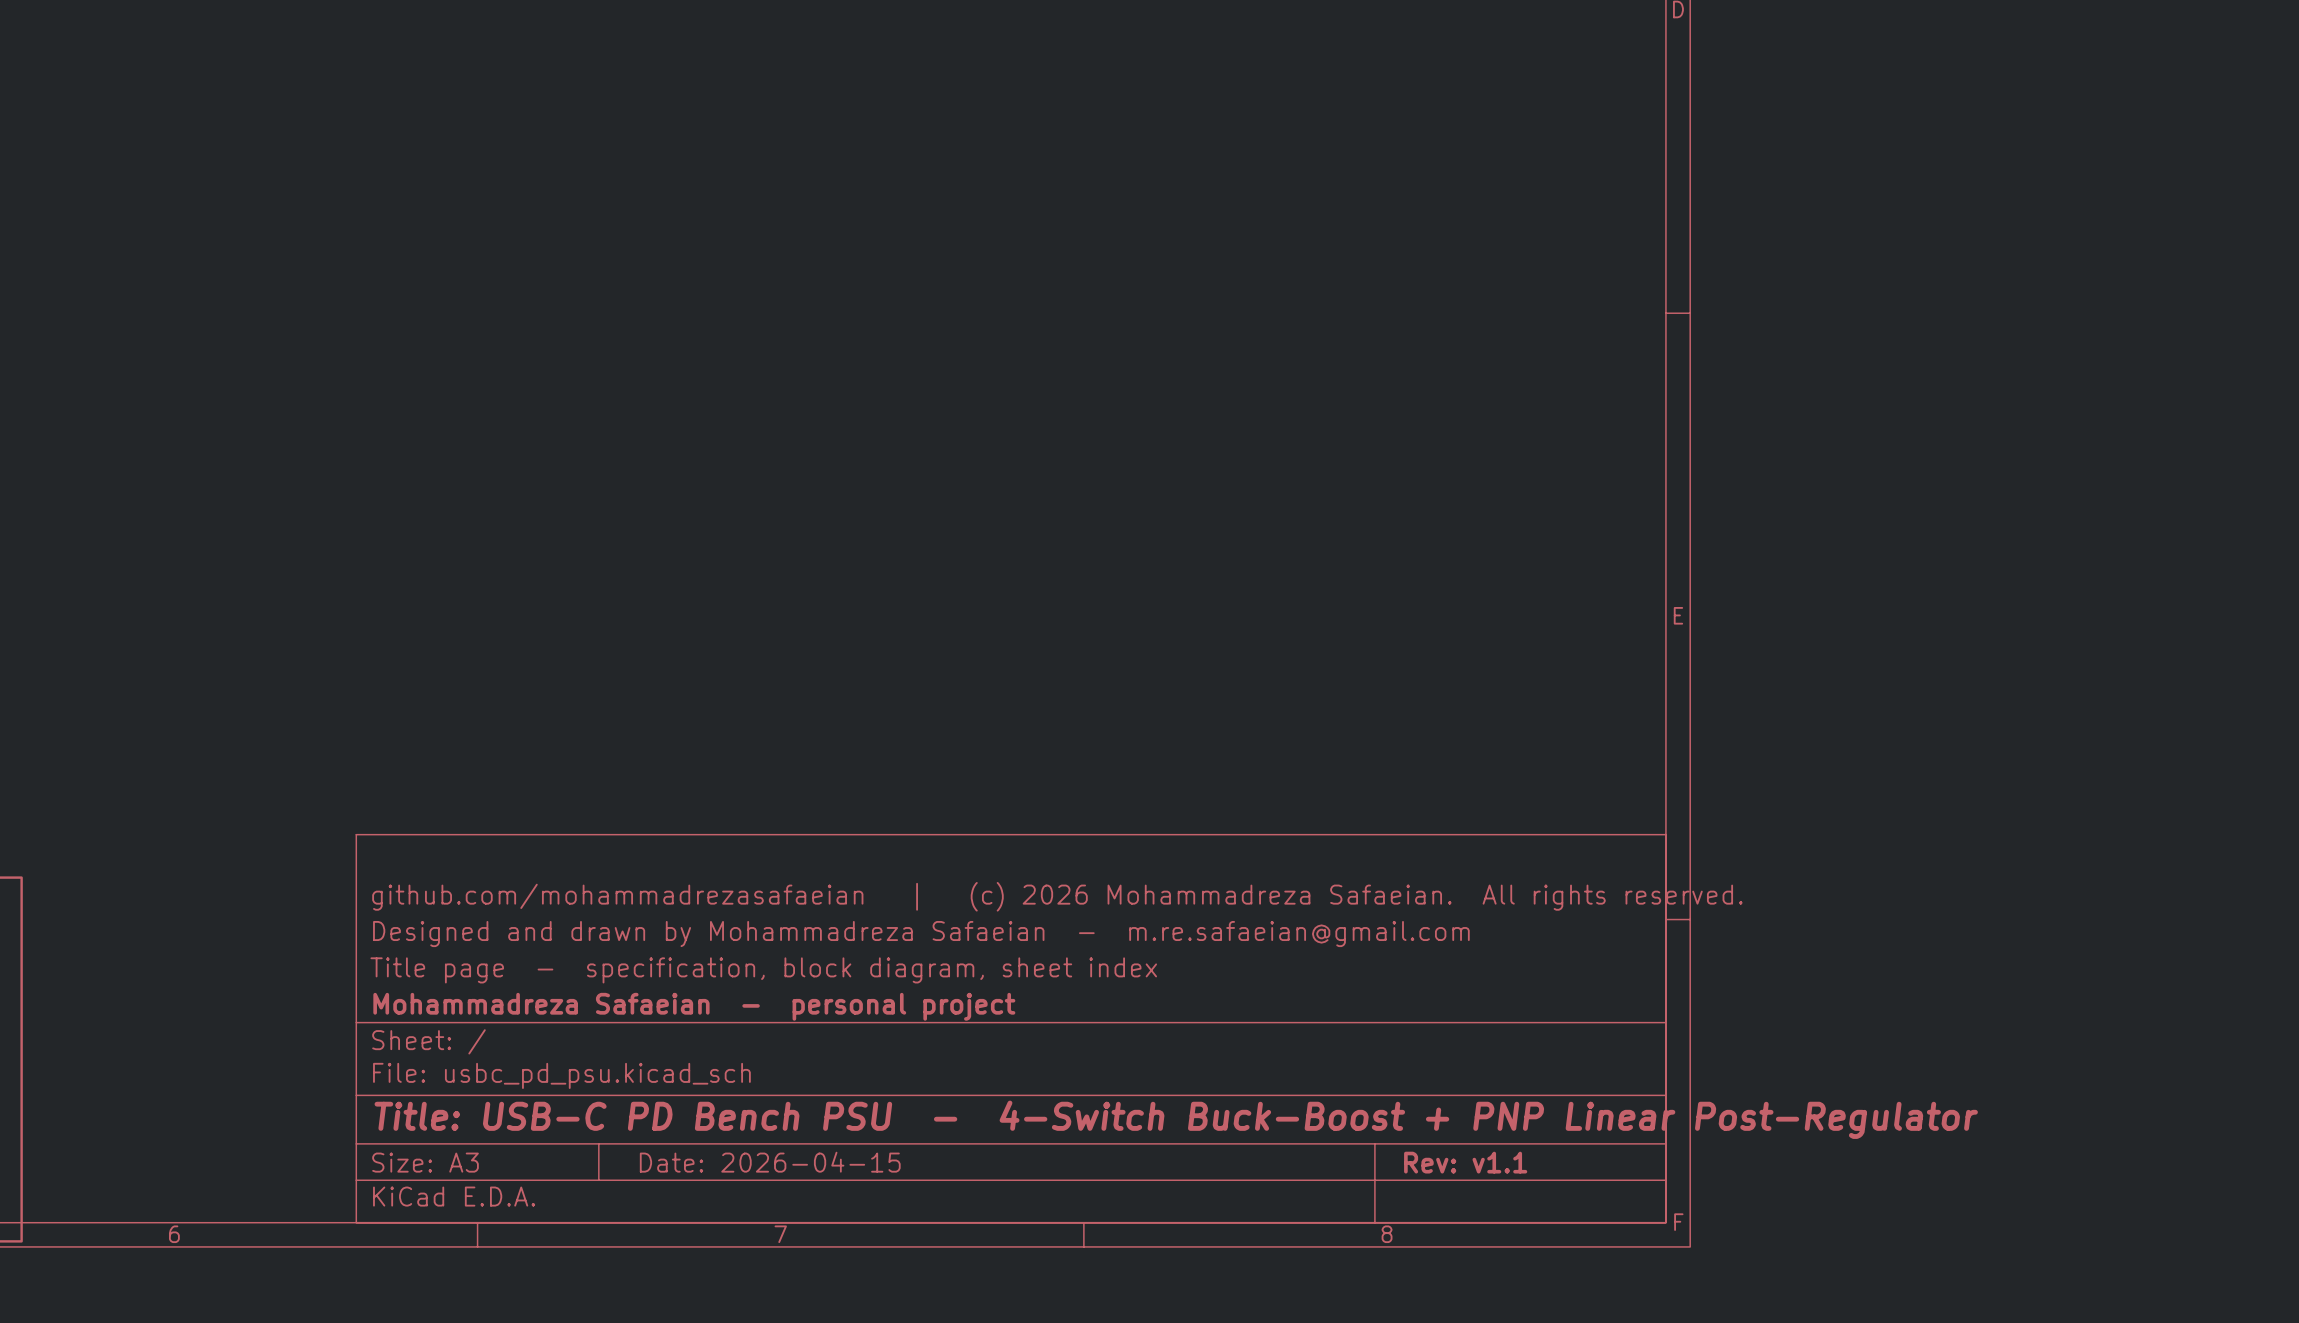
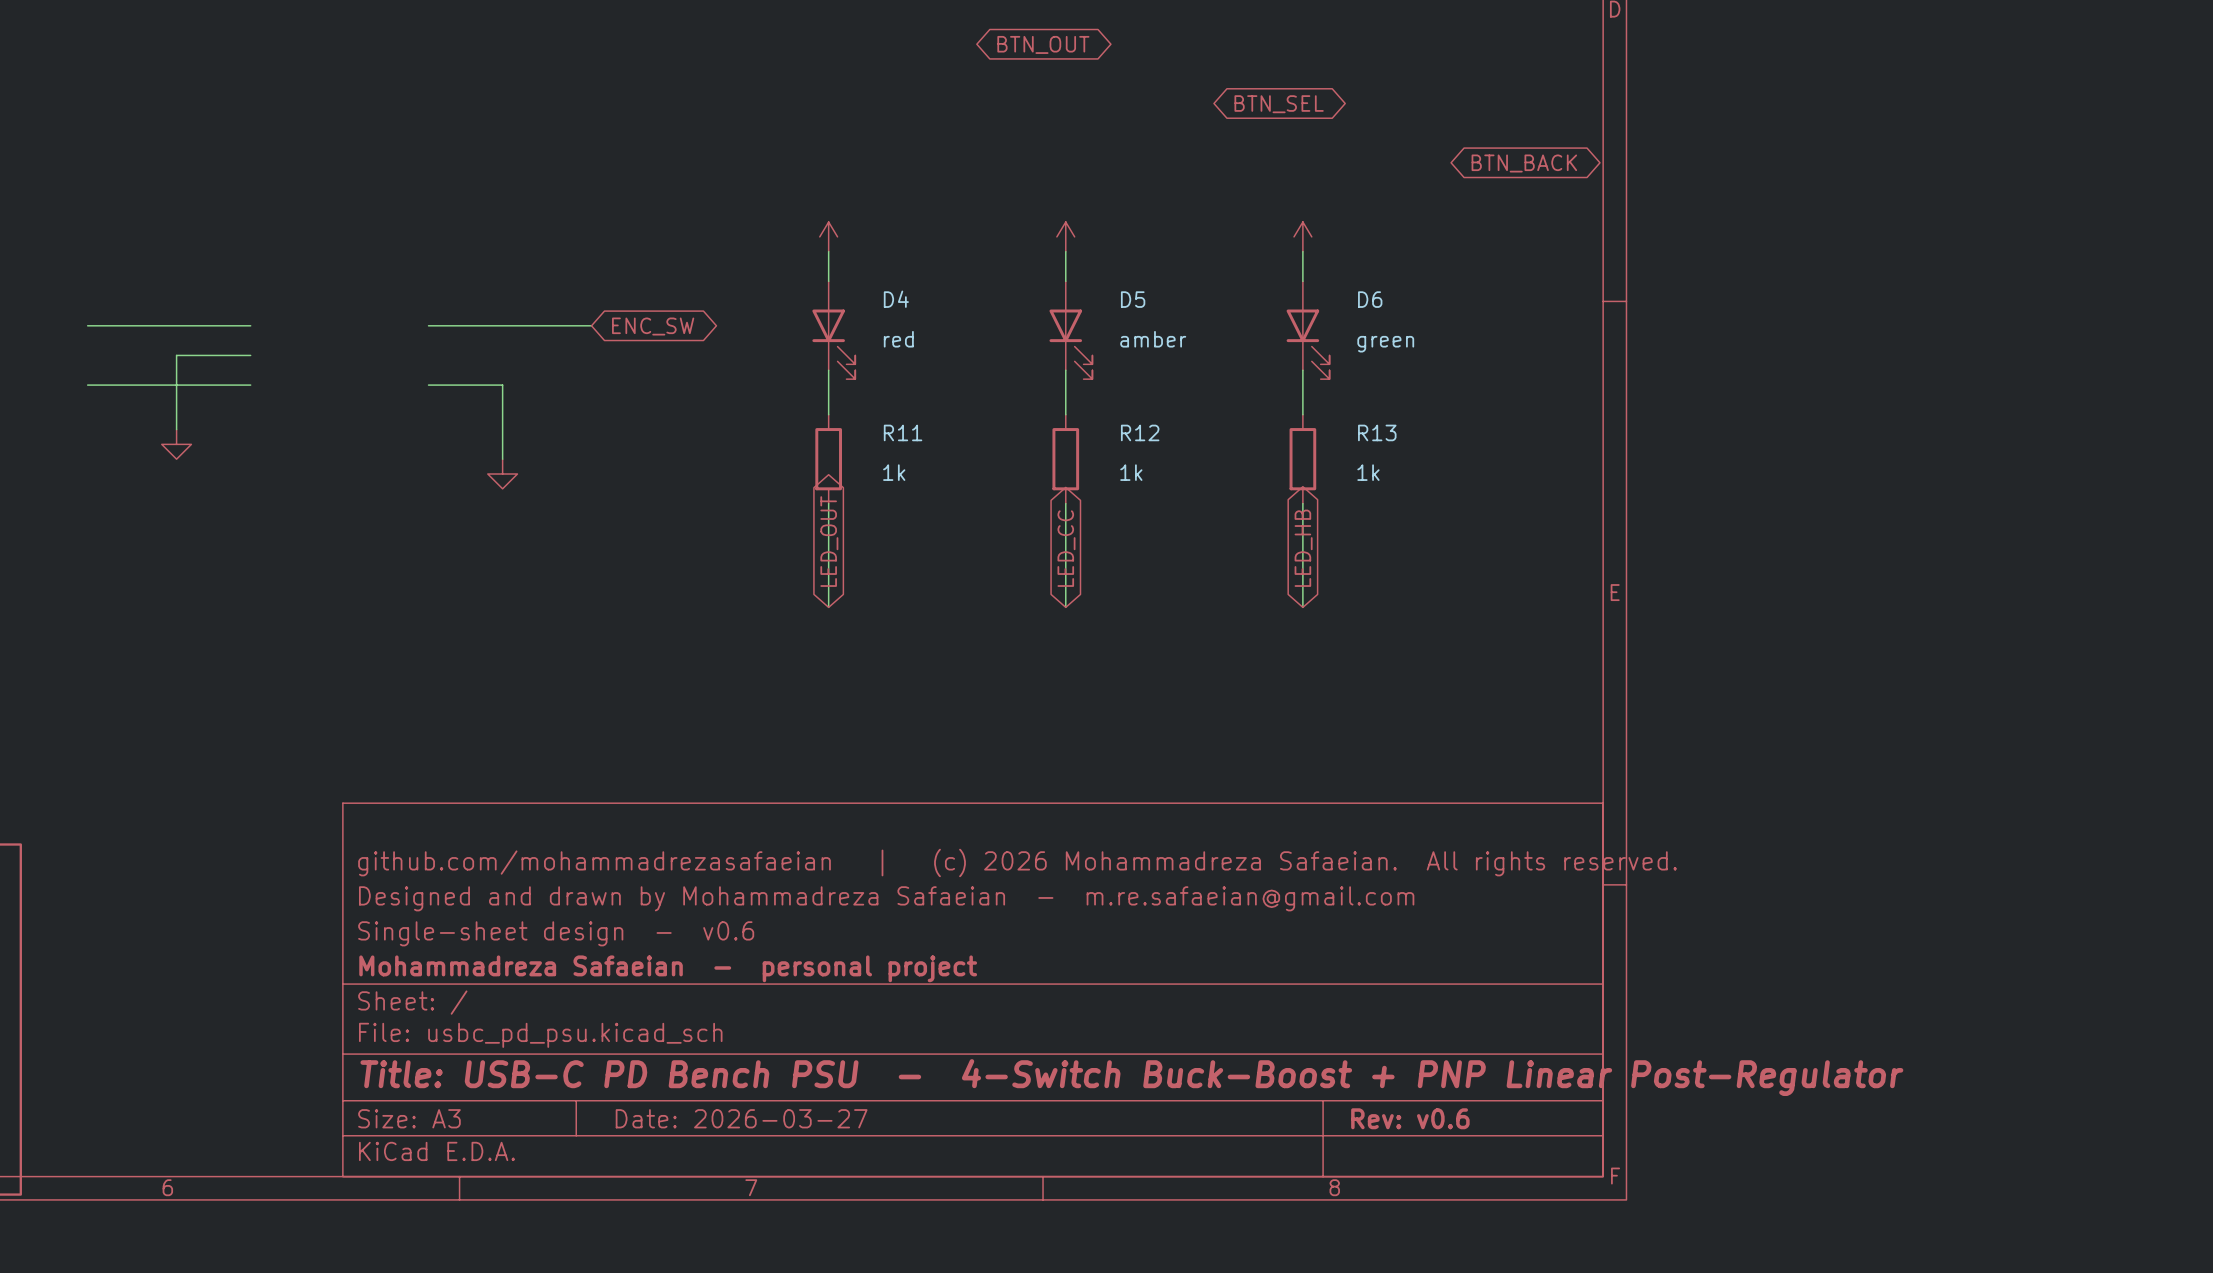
global label: none -> BTN_OUT (1043, 44)
global label: none -> BTN_SEL (1279, 104)
global label: none -> BTN_BACK (1524, 163)
power symbol: none -> (828, 236)
power symbol: none -> (1065, 236)
power symbol: none -> (1302, 236)
wire: none -> (828, 251) (828, 281)
wire: none -> (1065, 251) (1065, 281)
wire: none -> (1302, 251) (1302, 281)
wire: none -> (87, 325) (250, 325)
wire: none -> (428, 325) (591, 325)
global label: none -> ENC_SW (653, 326)
D4: none -> red (833, 330)
D5: none -> amber (1070, 330)
D6: none -> green (1308, 330)
wire: none -> (250, 355) (176, 355) (176, 429)
wire: none -> (828, 370) (828, 414)
wire: none -> (1065, 370) (1065, 414)
wire: none -> (1302, 370) (1302, 414)
wire: none -> (87, 385) (250, 385)
wire: none -> (428, 385) (502, 385) (502, 459)
power symbol: none -> (176, 444)
R11: none -> 1k (828, 459)
R12: none -> 1k (1065, 459)
R13: none -> 1k (1302, 459)
power symbol: none -> (502, 474)
wire: none -> (828, 503) (828, 607)
wire: none -> (1065, 503) (1065, 607)
wire: none -> (1302, 503) (1302, 607)
global label: none -> LED_OUT (829, 541)
global label: none -> LED_HB (1303, 548)
global label: none -> LED_CC (1066, 548)
title block: Title page - specification, block diagram, sheet index (763, 970) -> Single-sheet design - v0.6 (556, 933)
title block: Date: 2026-04-15 (770, 1162) -> Date: 2026-03-27 (741, 1118)
title block: Rev: v1.1 (1465, 1162) -> Rev: v0.6 (1410, 1118)

